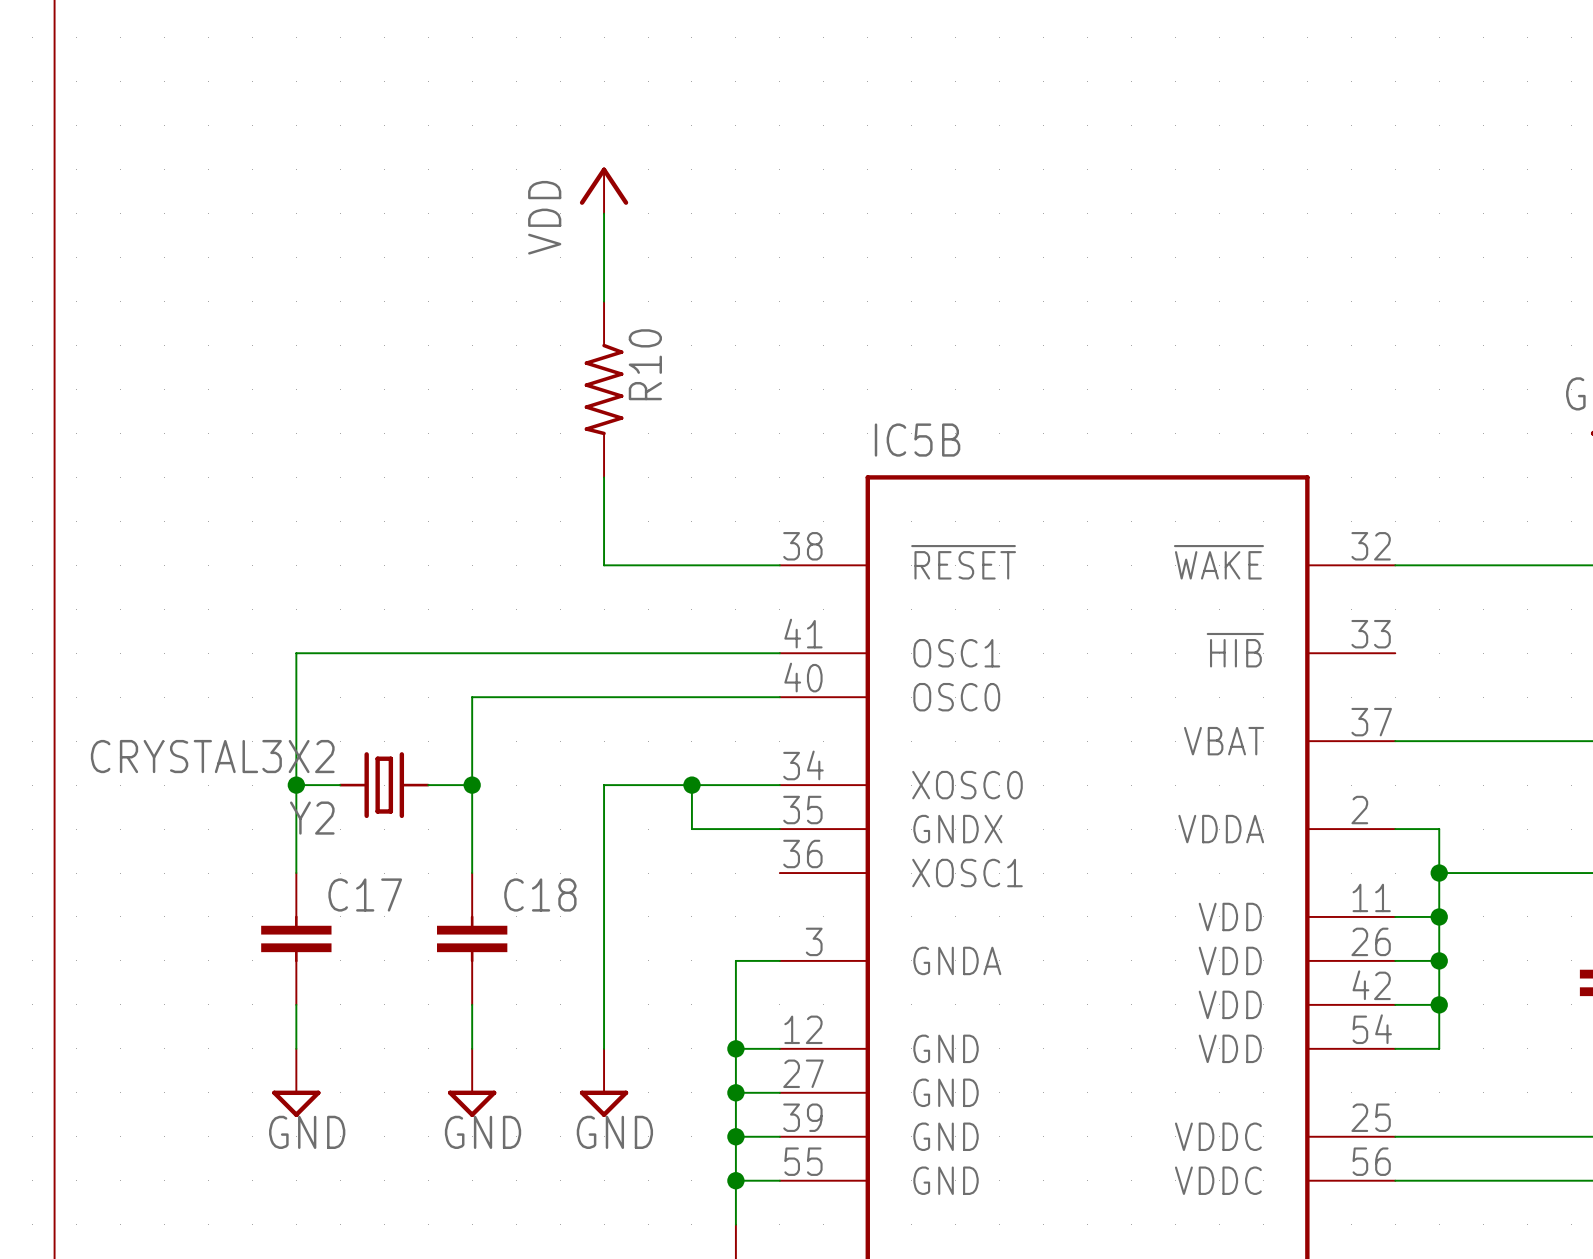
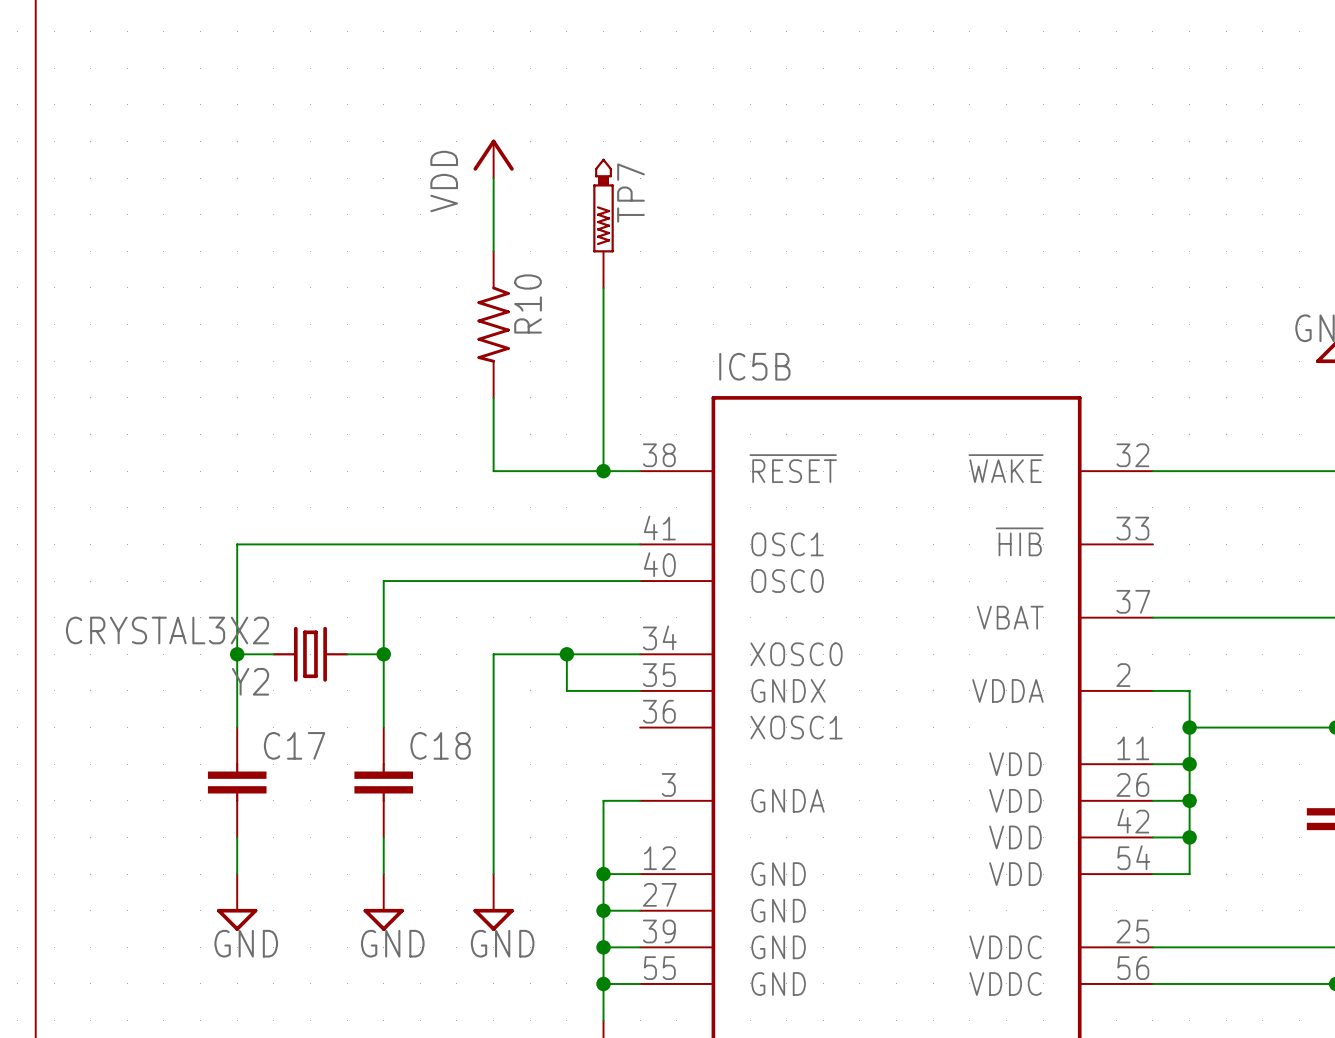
TP7: none -> (603, 223)
wire: none -> (603, 287) (603, 471)
junction: none -> (603, 471)

